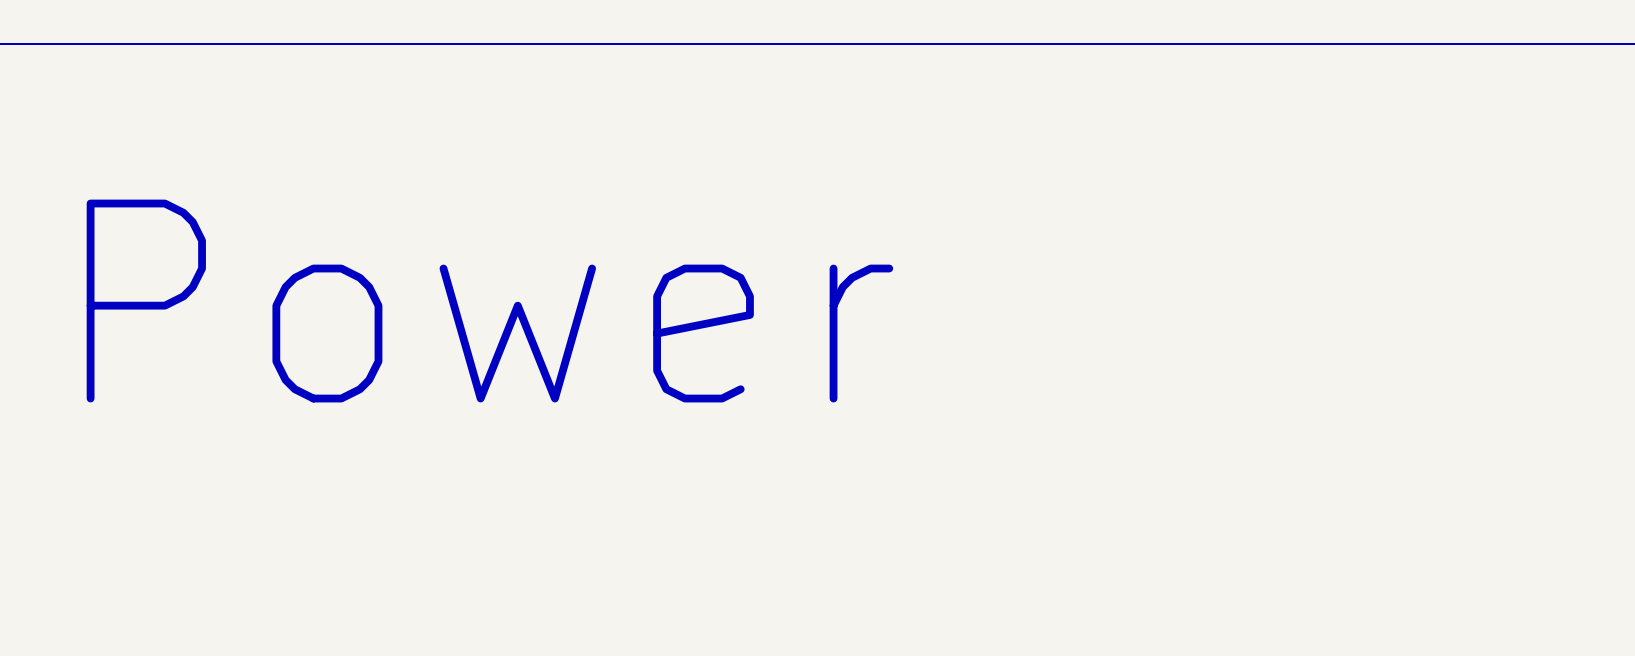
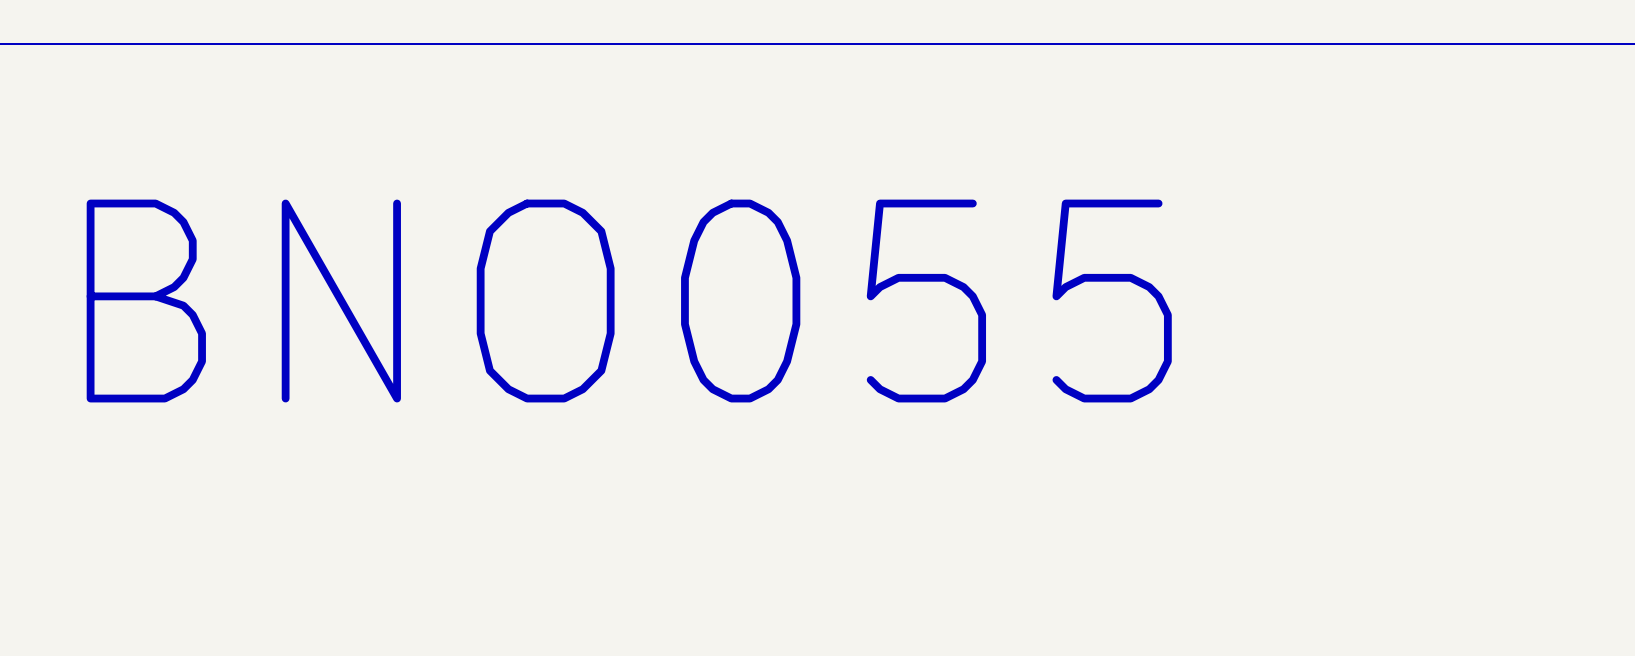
text: Power (489, 301) -> BNO055 (629, 301)

